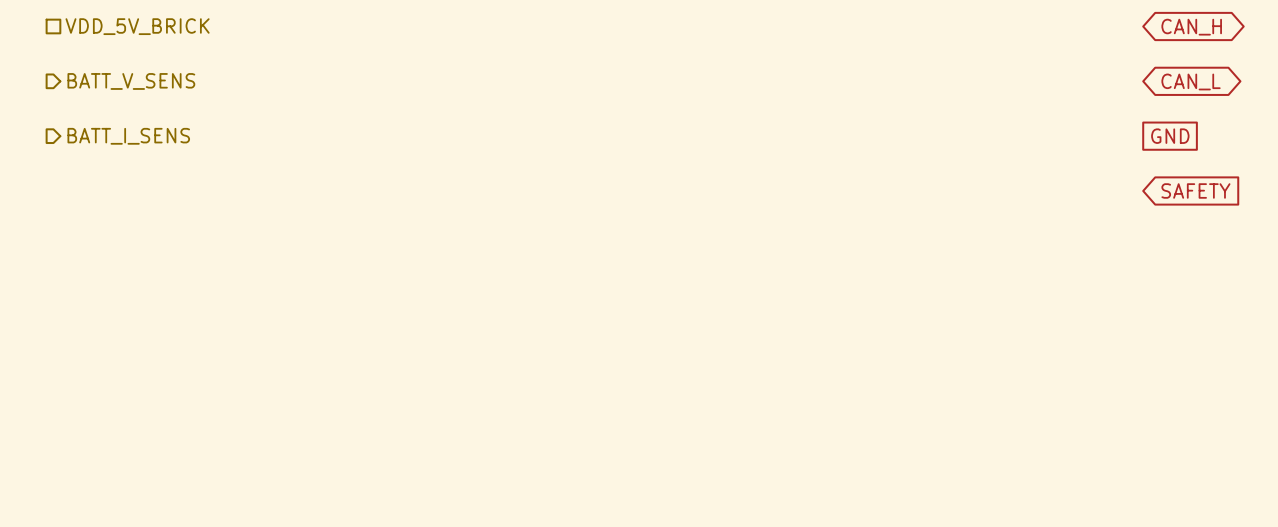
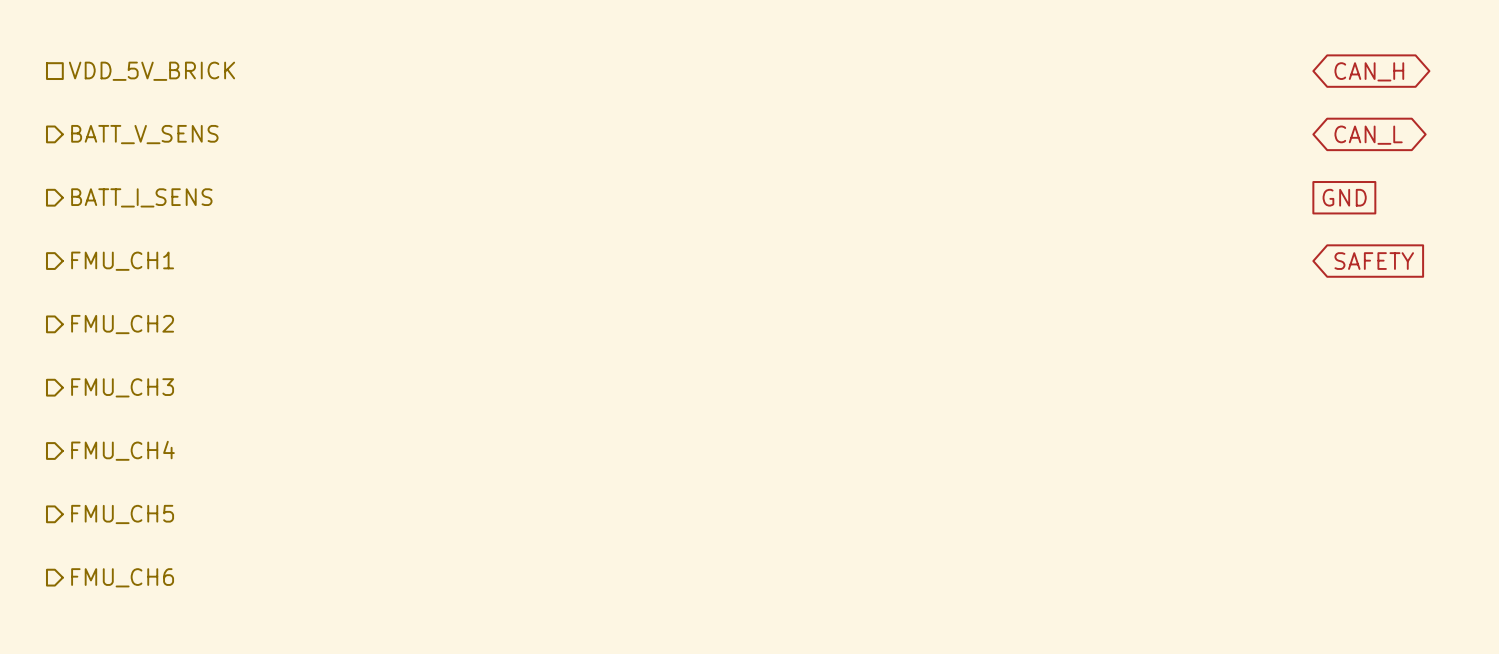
hierarchical label: none -> FMU_CH1 (122, 261)
hierarchical label: none -> FMU_CH2 (122, 324)
hierarchical label: none -> FMU_CH3 (122, 387)
hierarchical label: none -> FMU_CH4 (122, 450)
hierarchical label: none -> FMU_CH5 (122, 514)
hierarchical label: none -> FMU_CH6 (122, 577)

